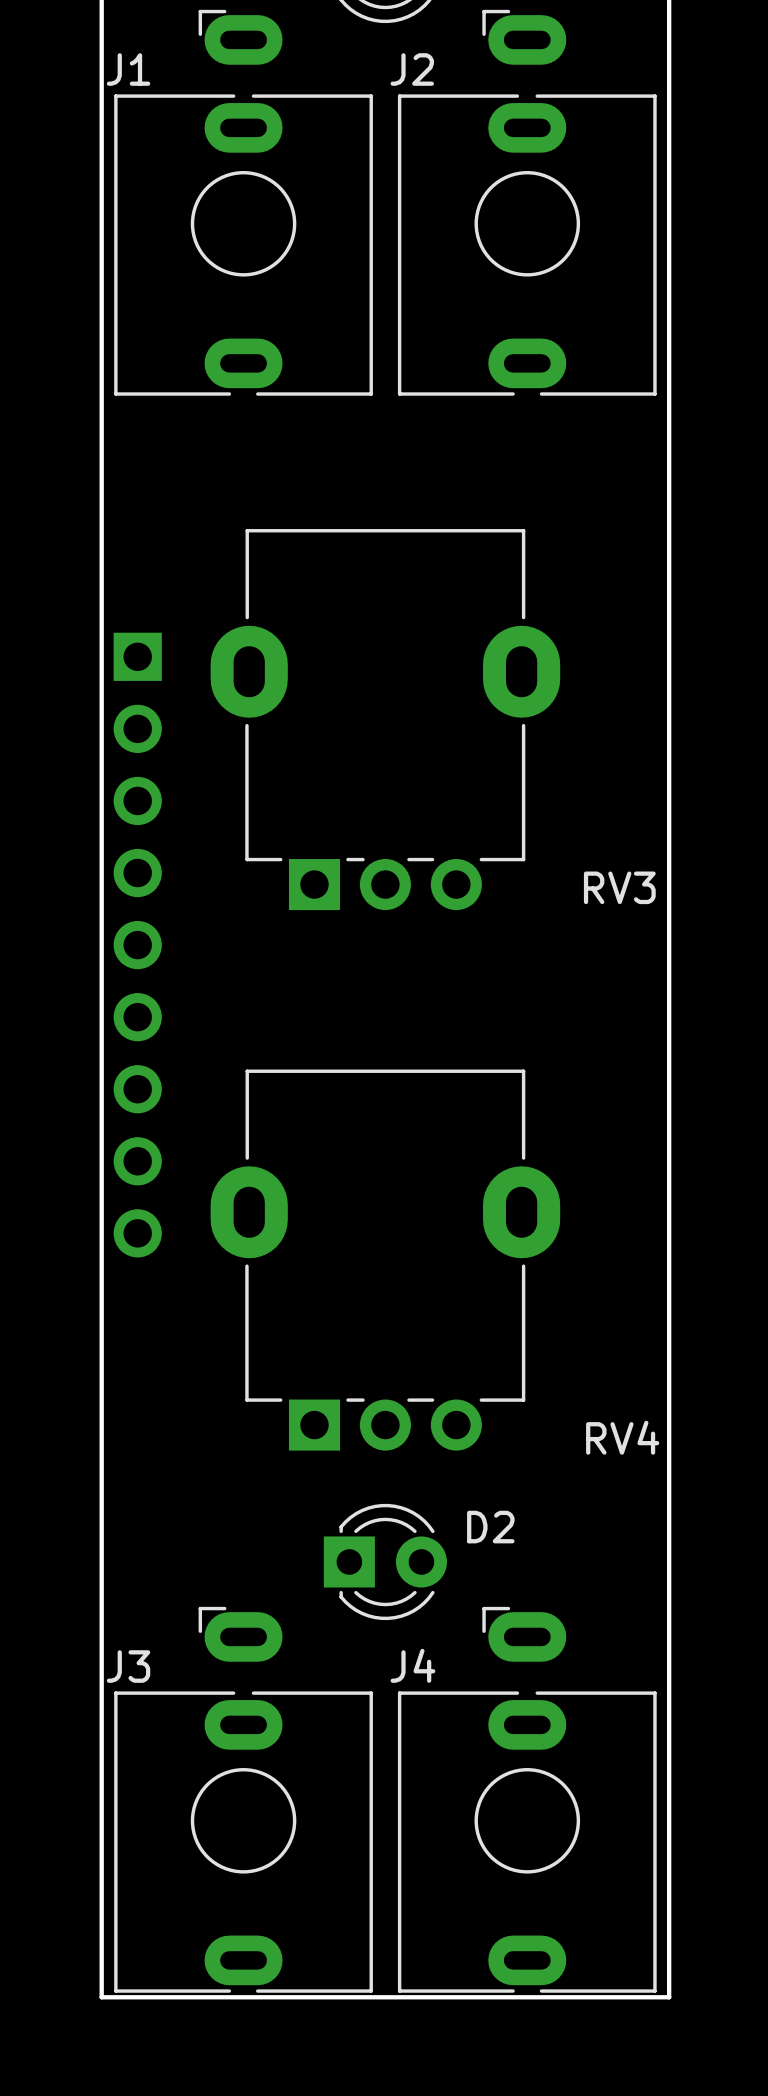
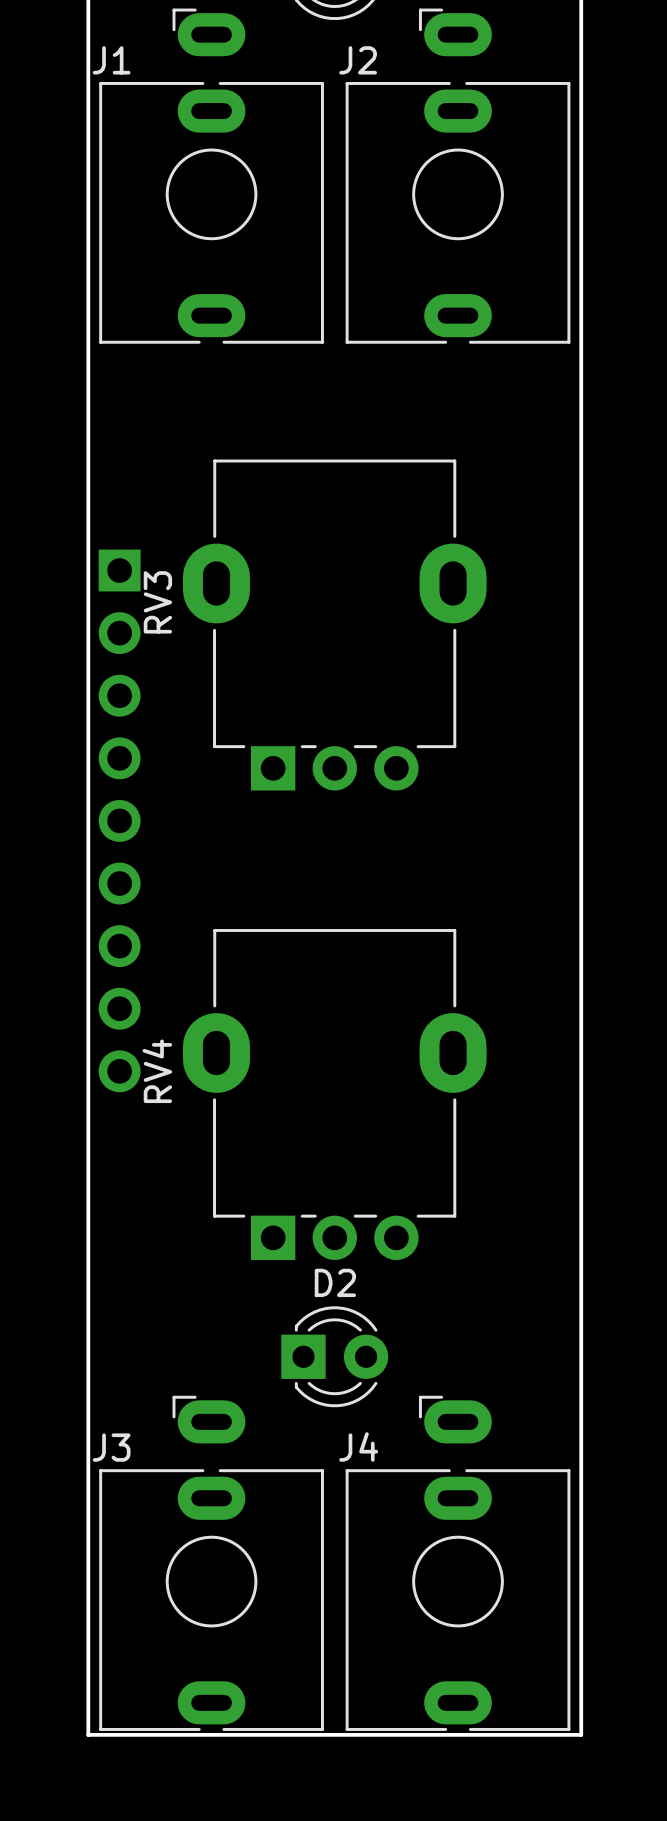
RV3 name rotation: 0° (619, 887) -> 90° counterclockwise (157, 602)
RV3 name position: RV3 (619, 887) -> RV3 (157, 602)
RV4 name rotation: 0° (622, 1437) -> 90° counterclockwise (157, 1071)
RV4 name position: RV4 (622, 1437) -> RV4 (157, 1071)
D2 name position: D2 (490, 1527) -> D2 (335, 1282)

